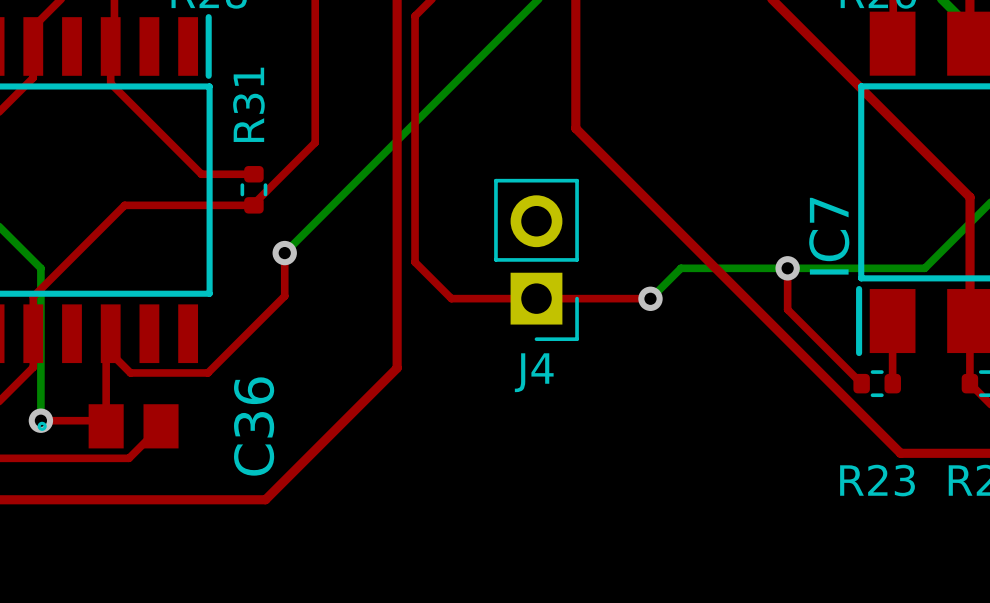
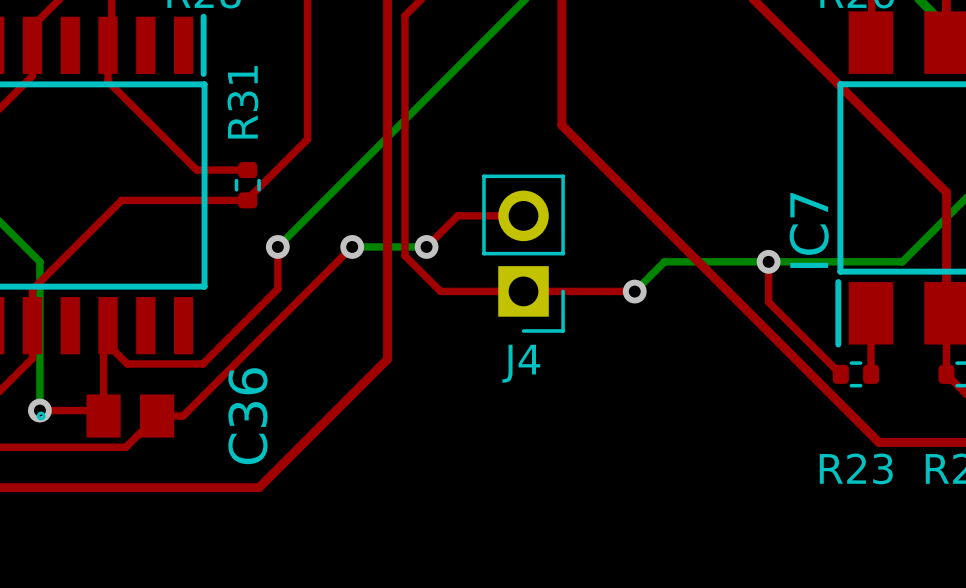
top track: none -> (523, 215) (457, 215) (426, 246)
top track: none -> (352, 246) (183, 416) (157, 416)
bottom track: none -> (352, 246) (426, 246)
via: none -> (352, 246)
via: none -> (426, 246)

